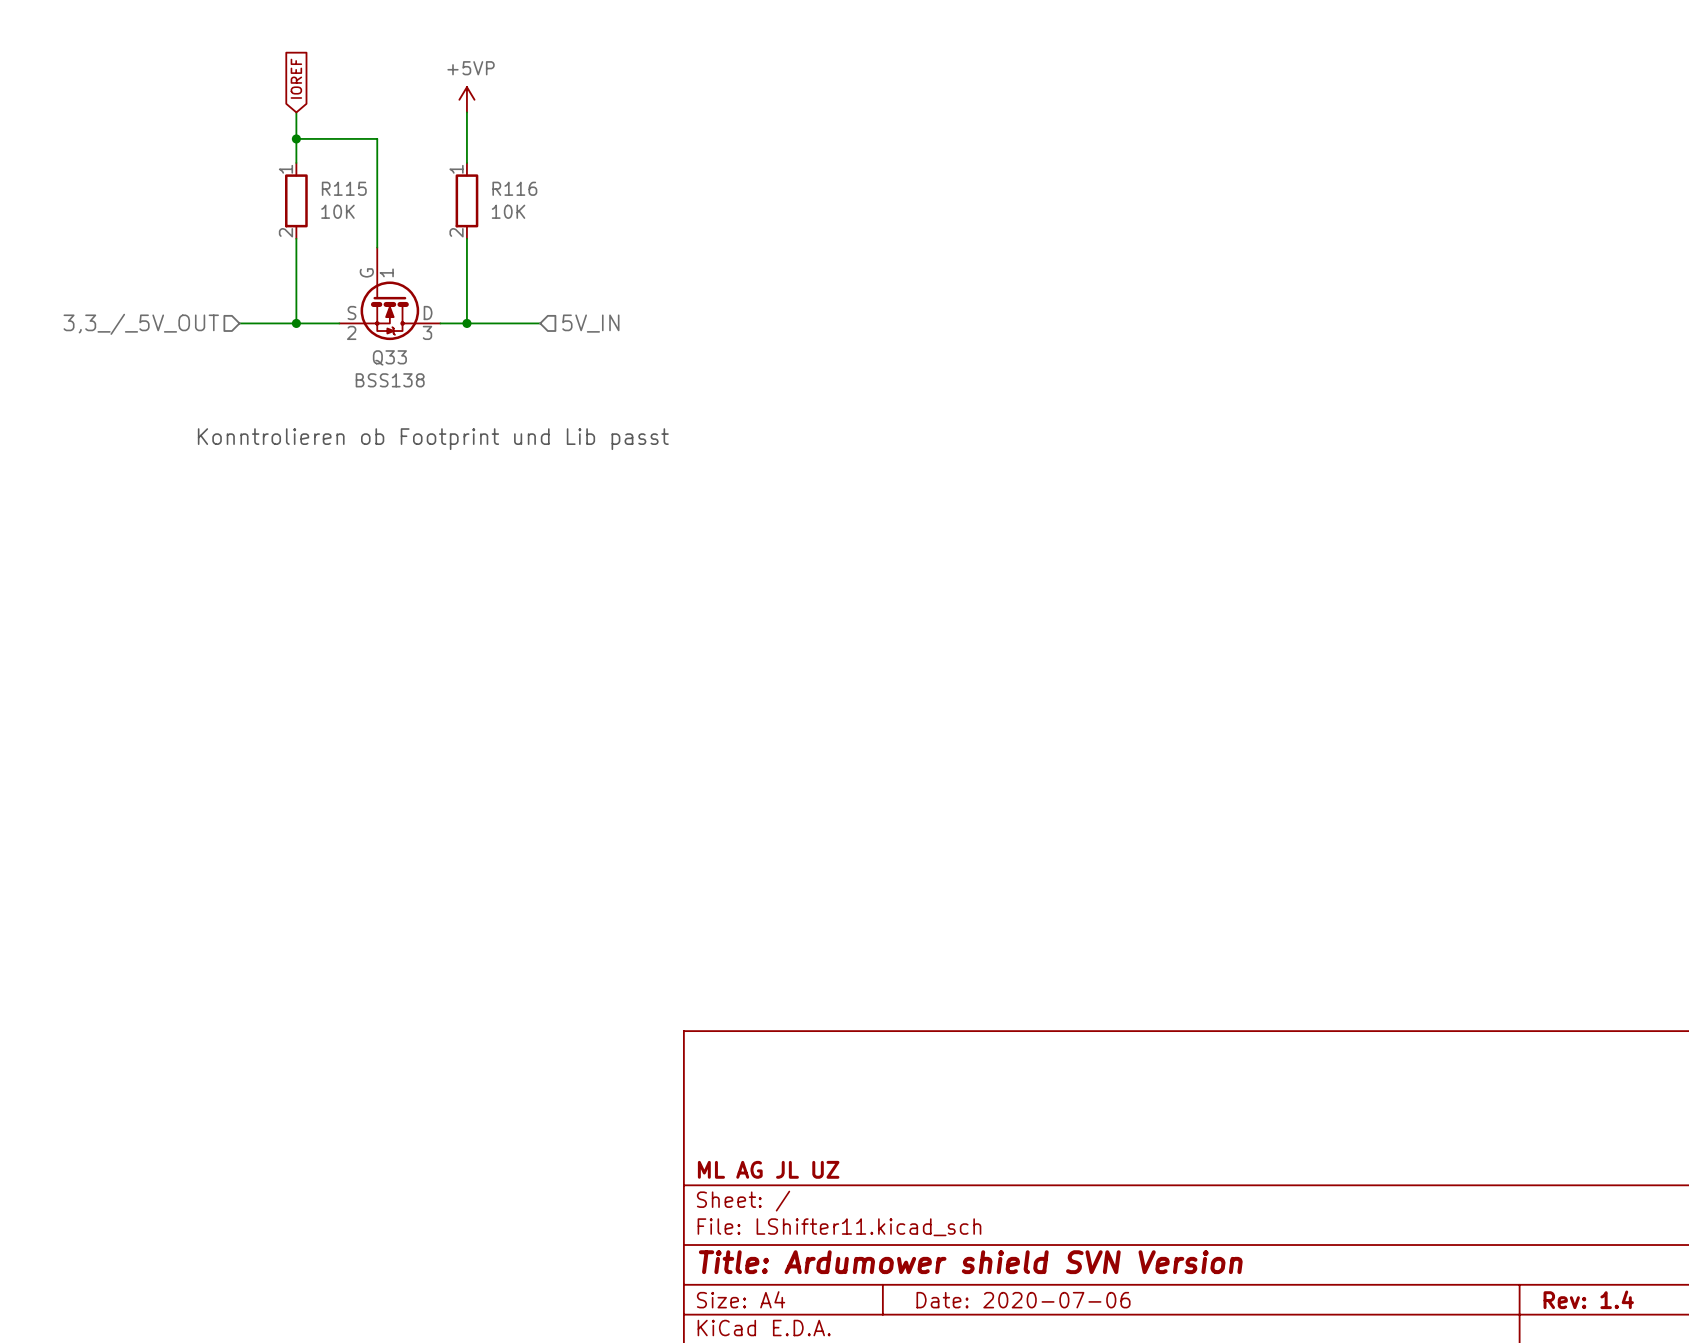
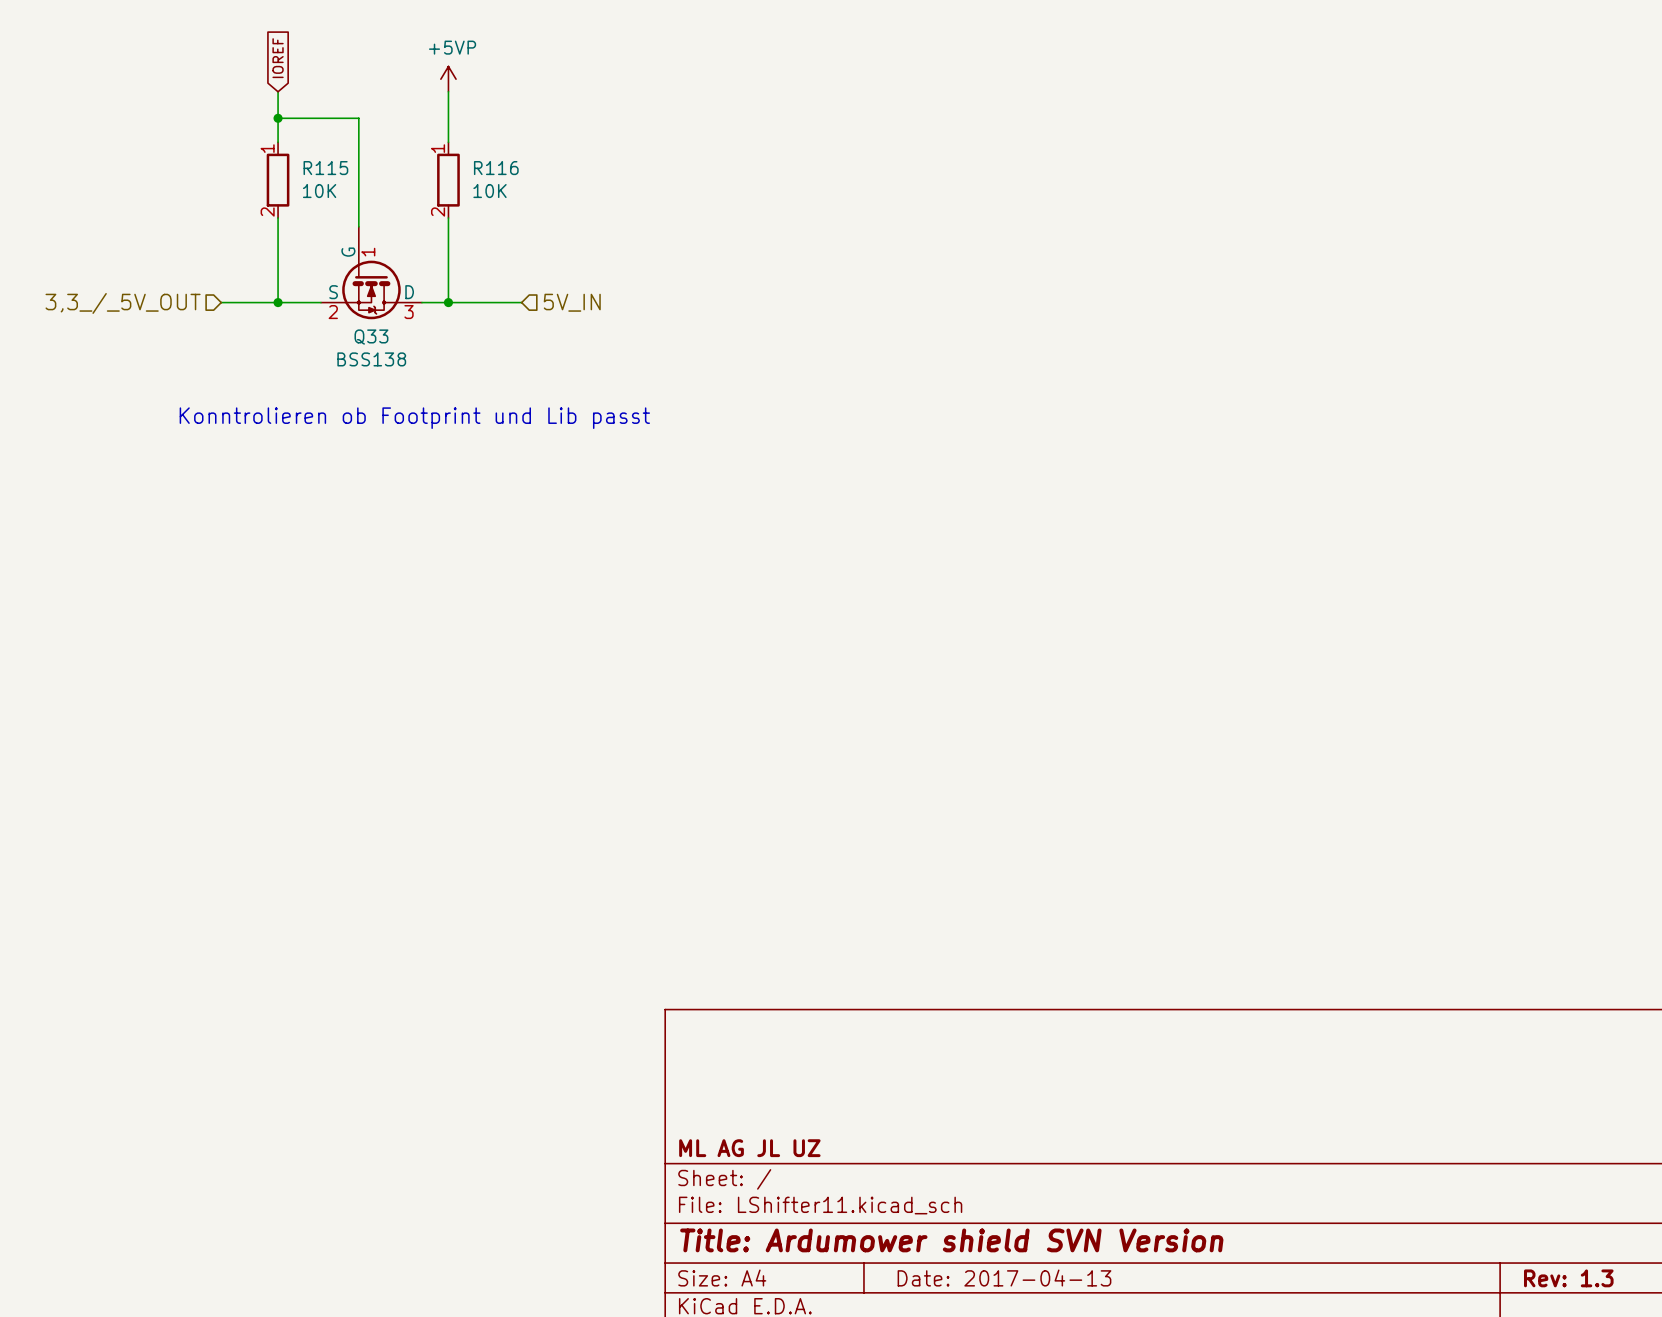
title block: Rev: 1.4 (1588, 1299) -> Rev: 1.3 (1568, 1278)
title block: Date: 2020-07-06 (1023, 1300) -> Date: 2017-04-13 (1004, 1278)

